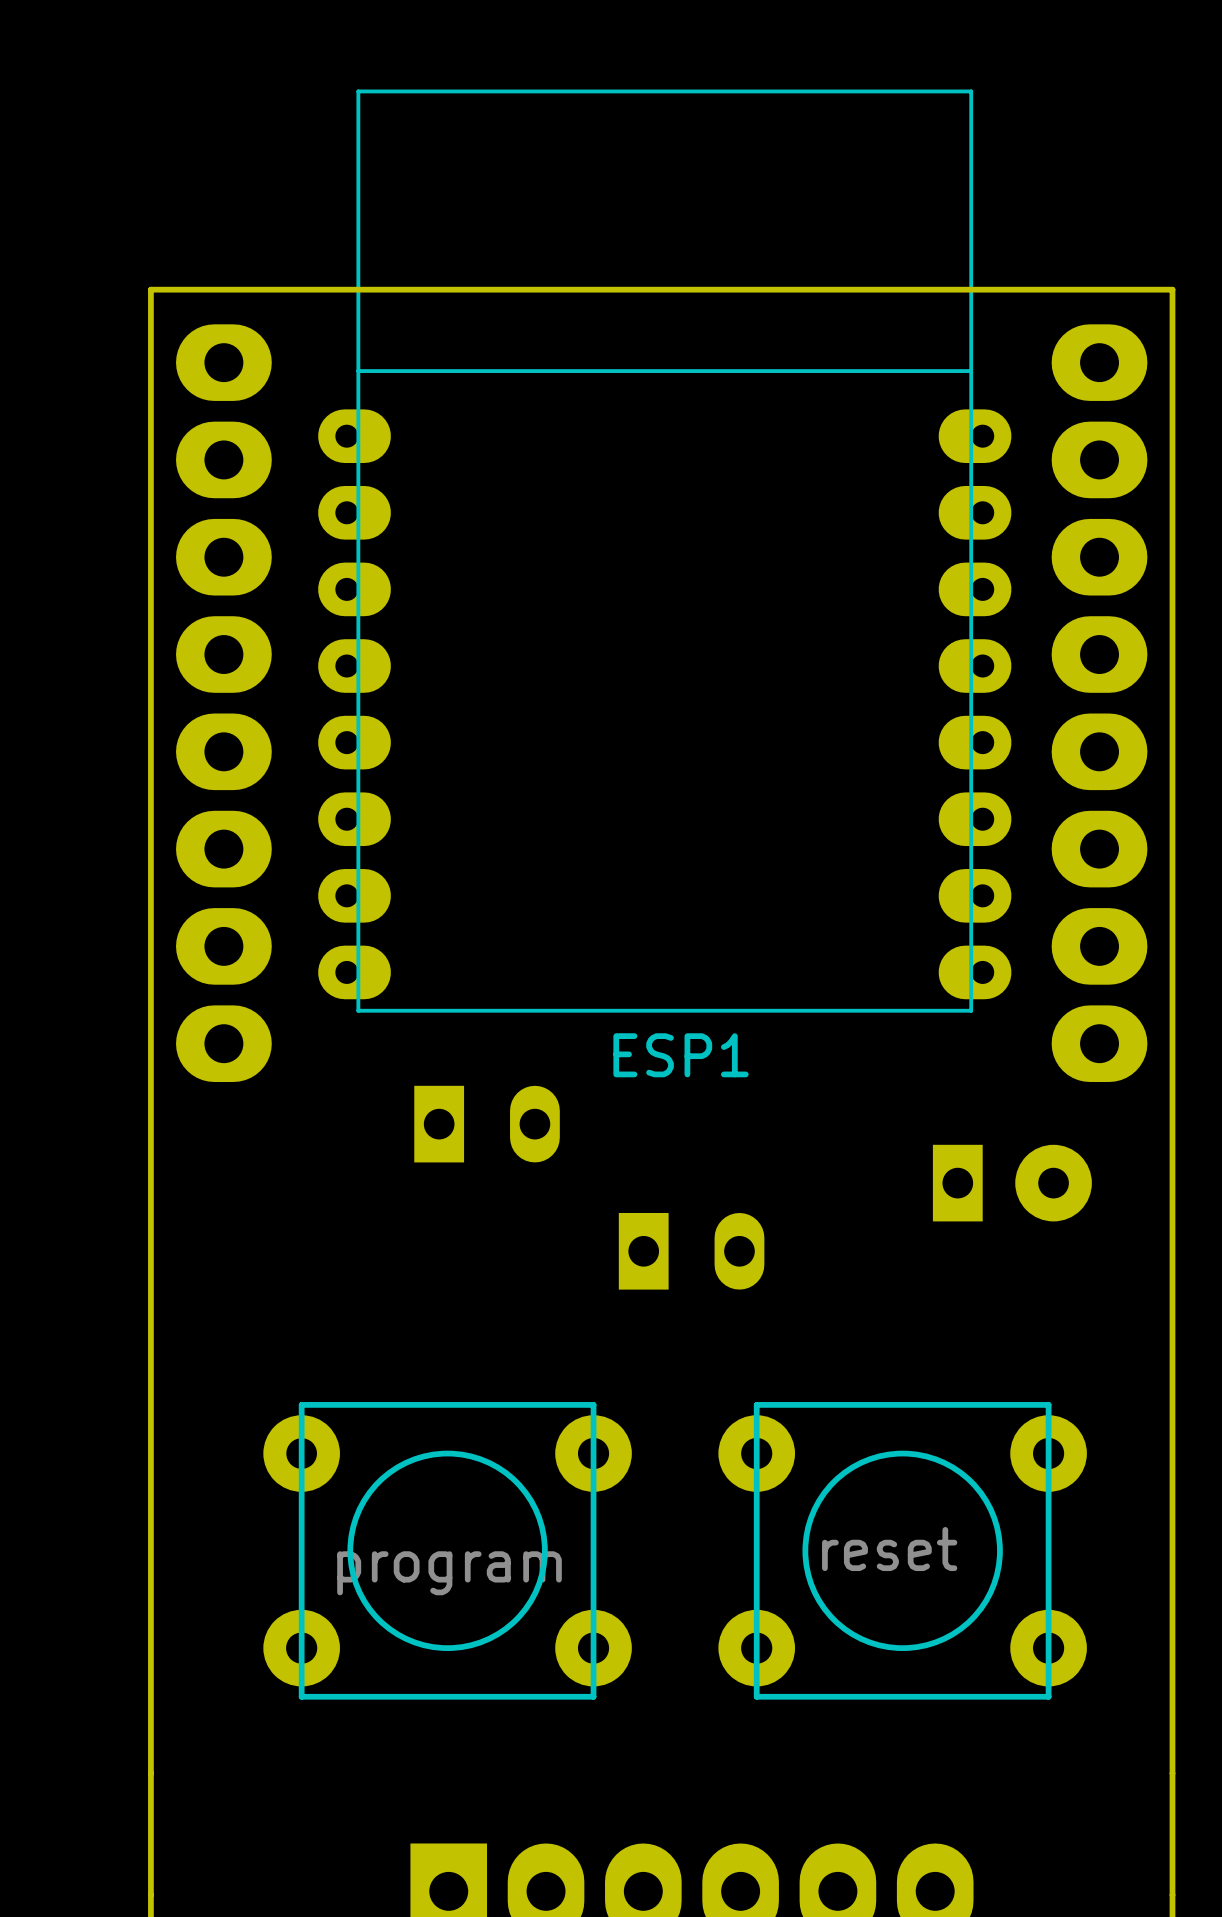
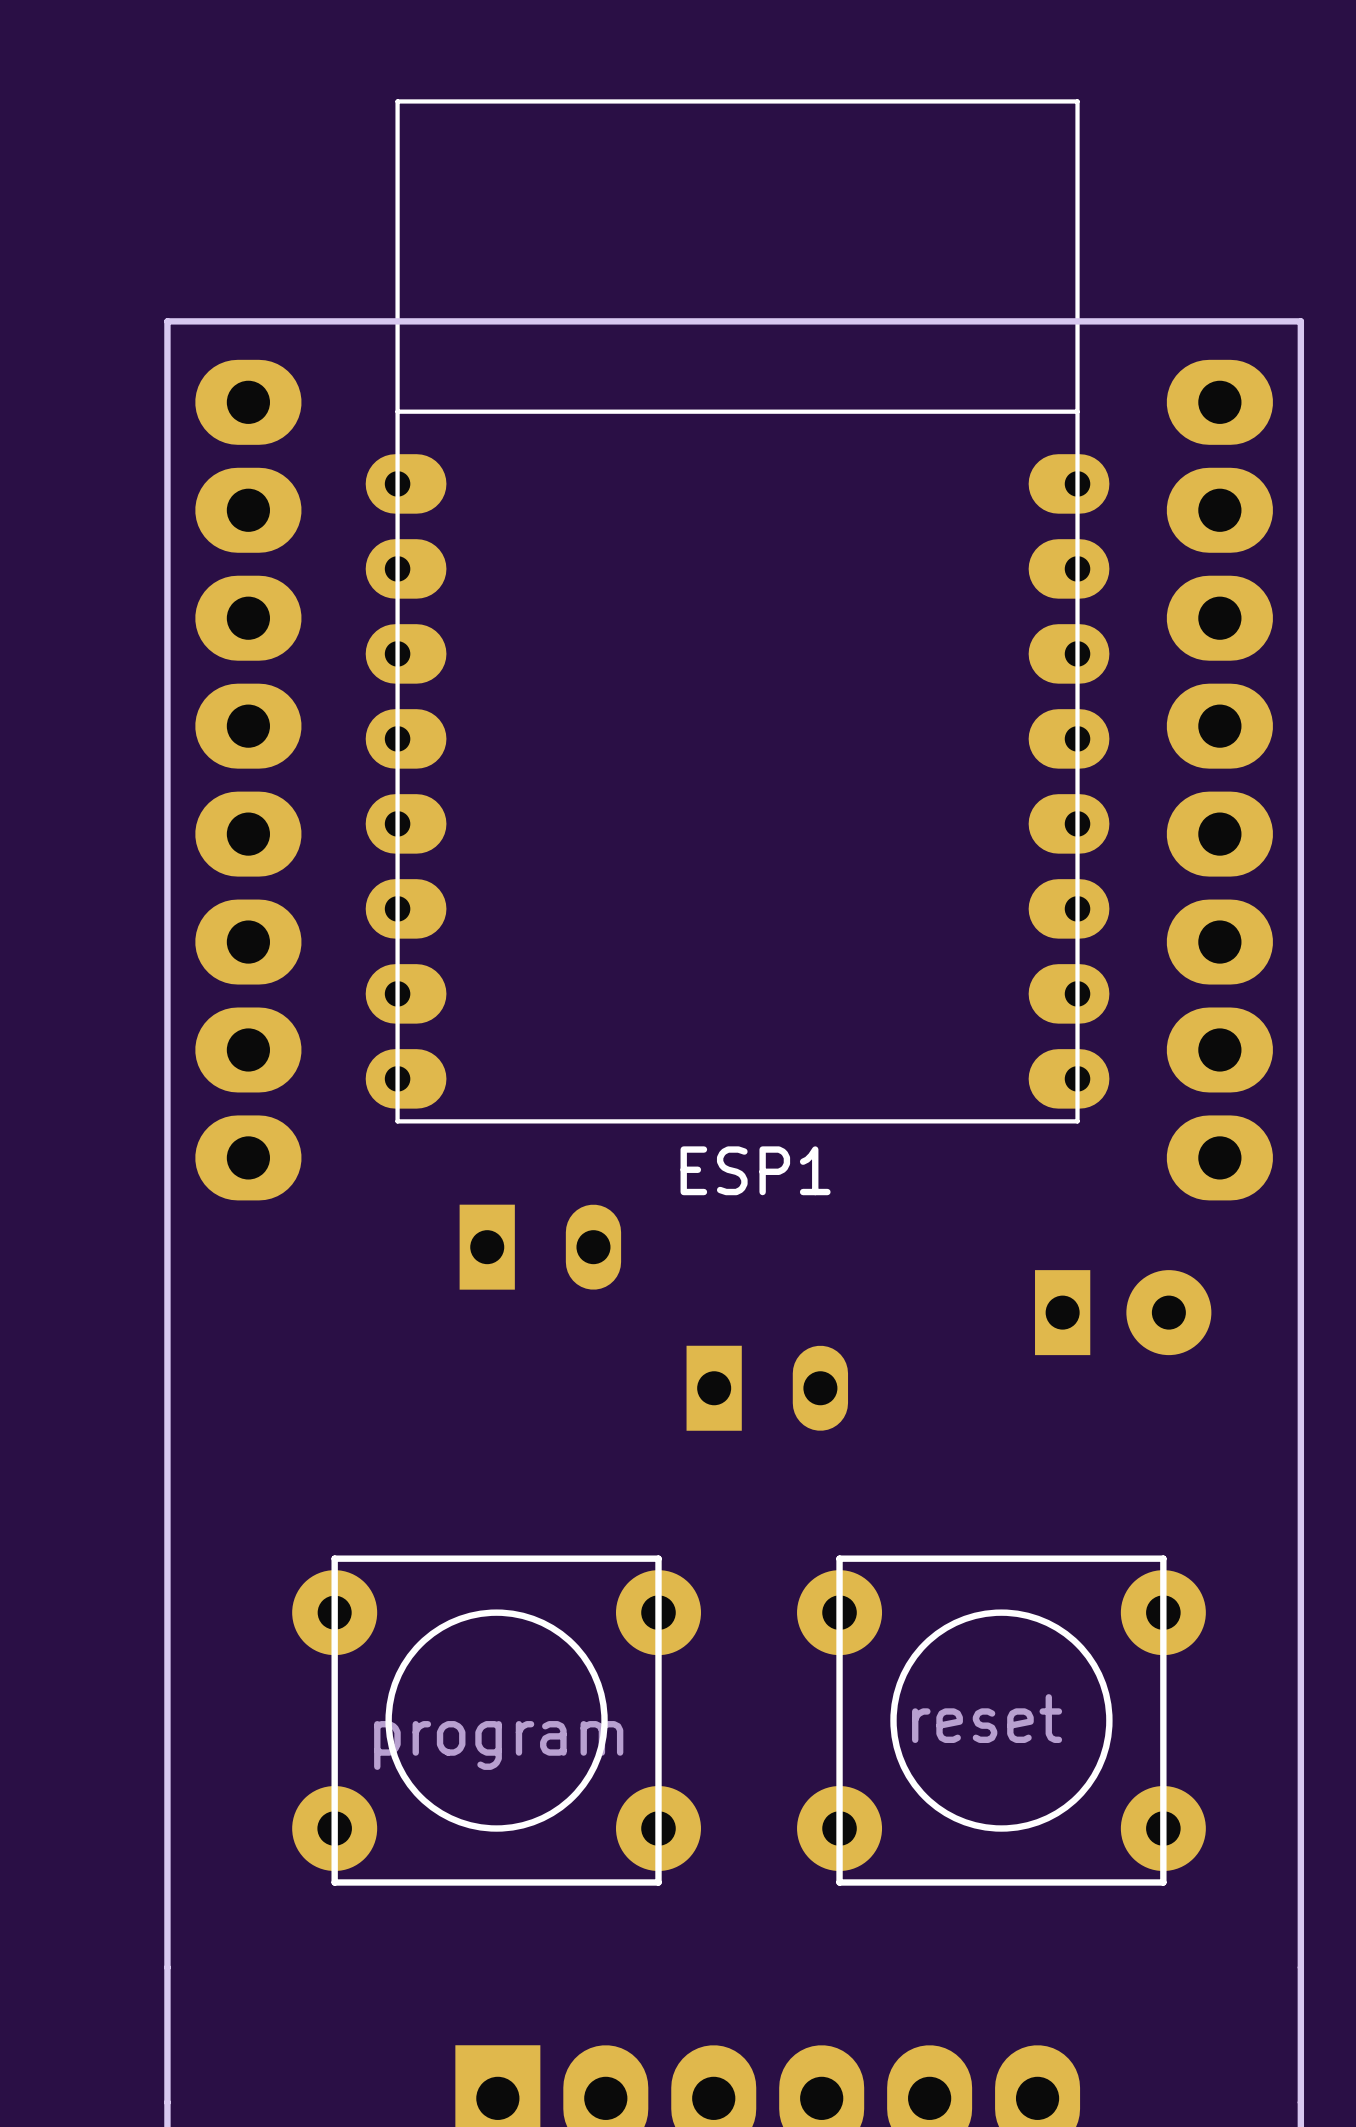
ESP1 footprint: [318, 89, 1012, 1013] -> [365, 99, 1110, 1124]

